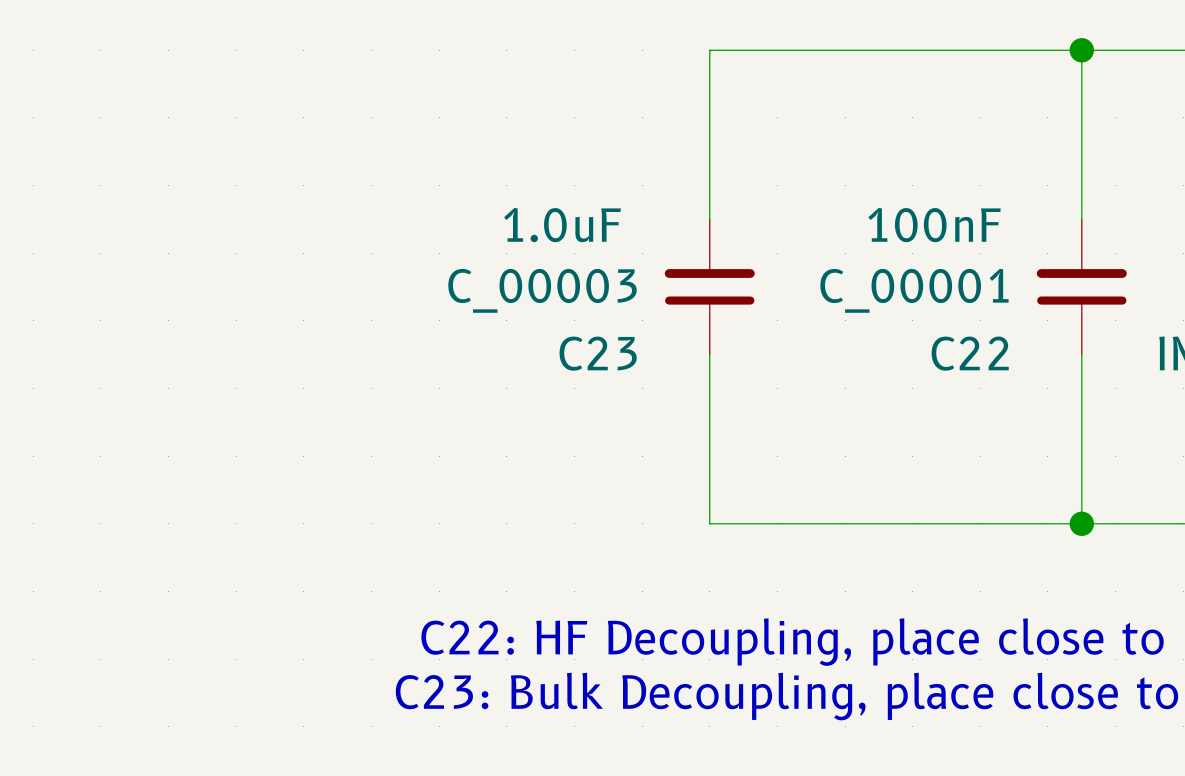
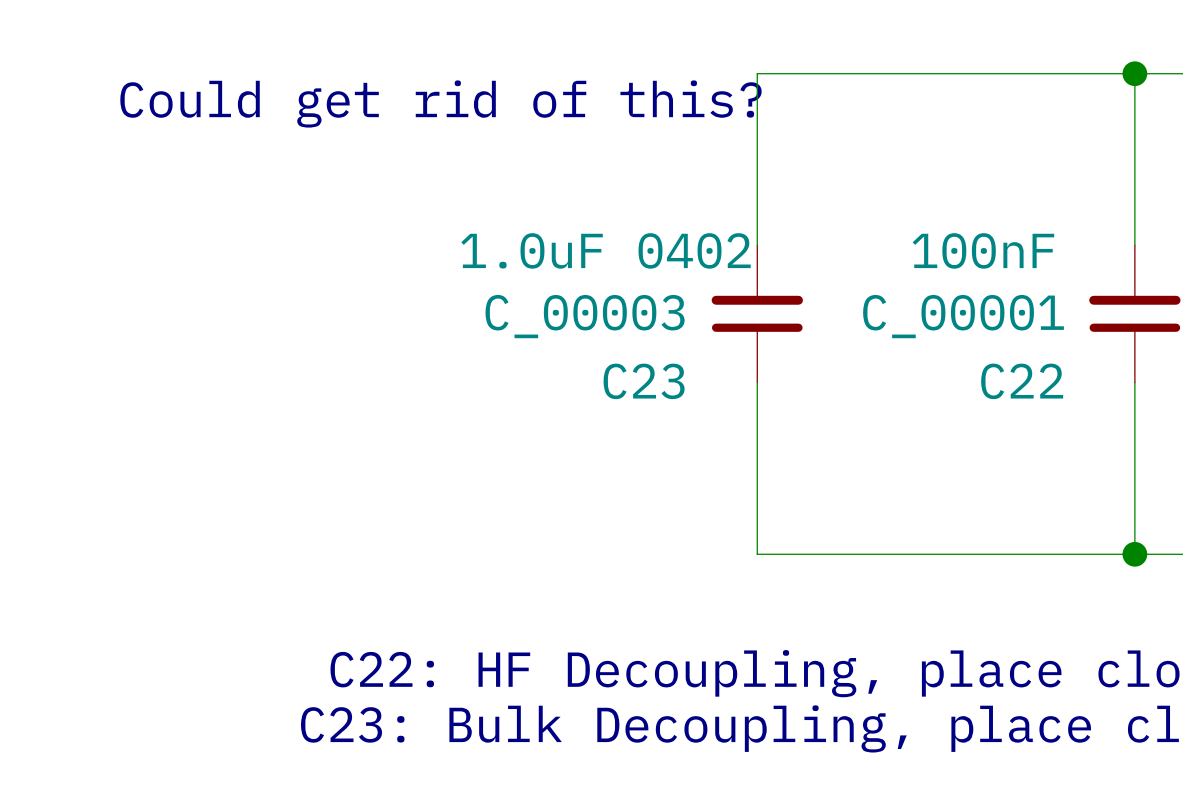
text: none -> Could get rid of this? (440, 103)
C23 text: 1.0uF (562, 225) -> 1.0uF 0402 (606, 250)

